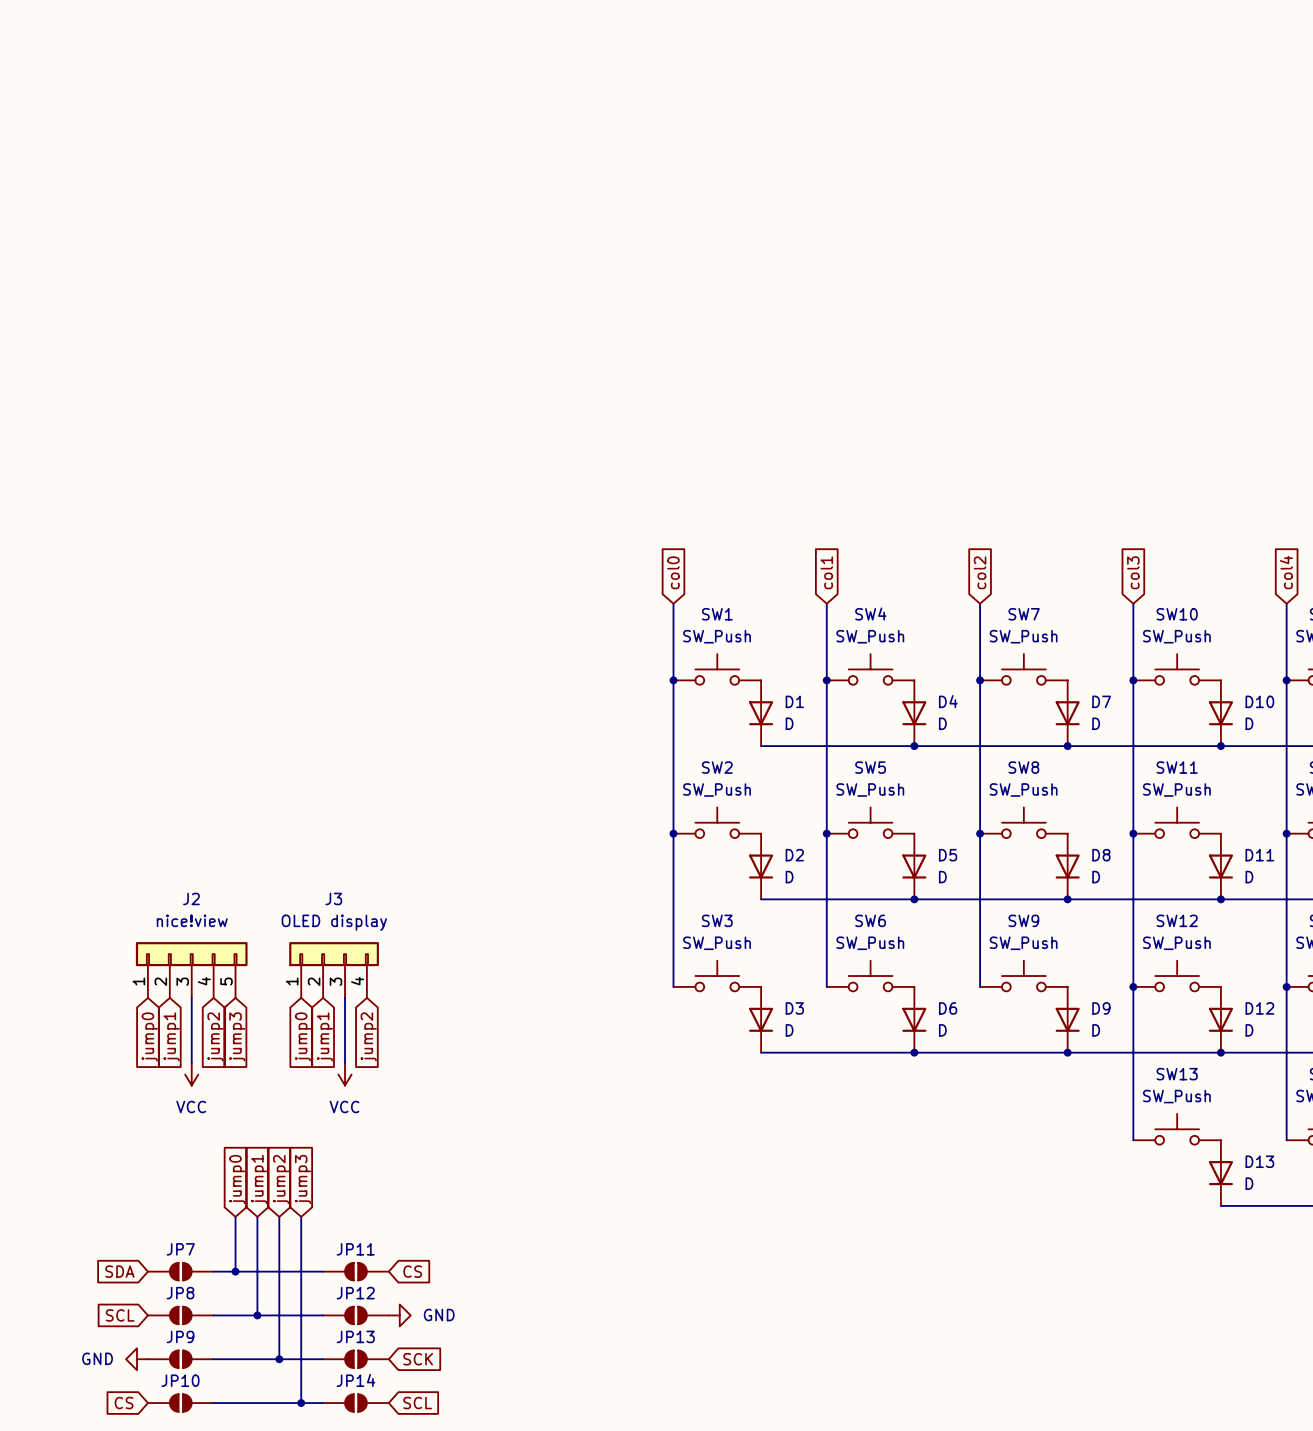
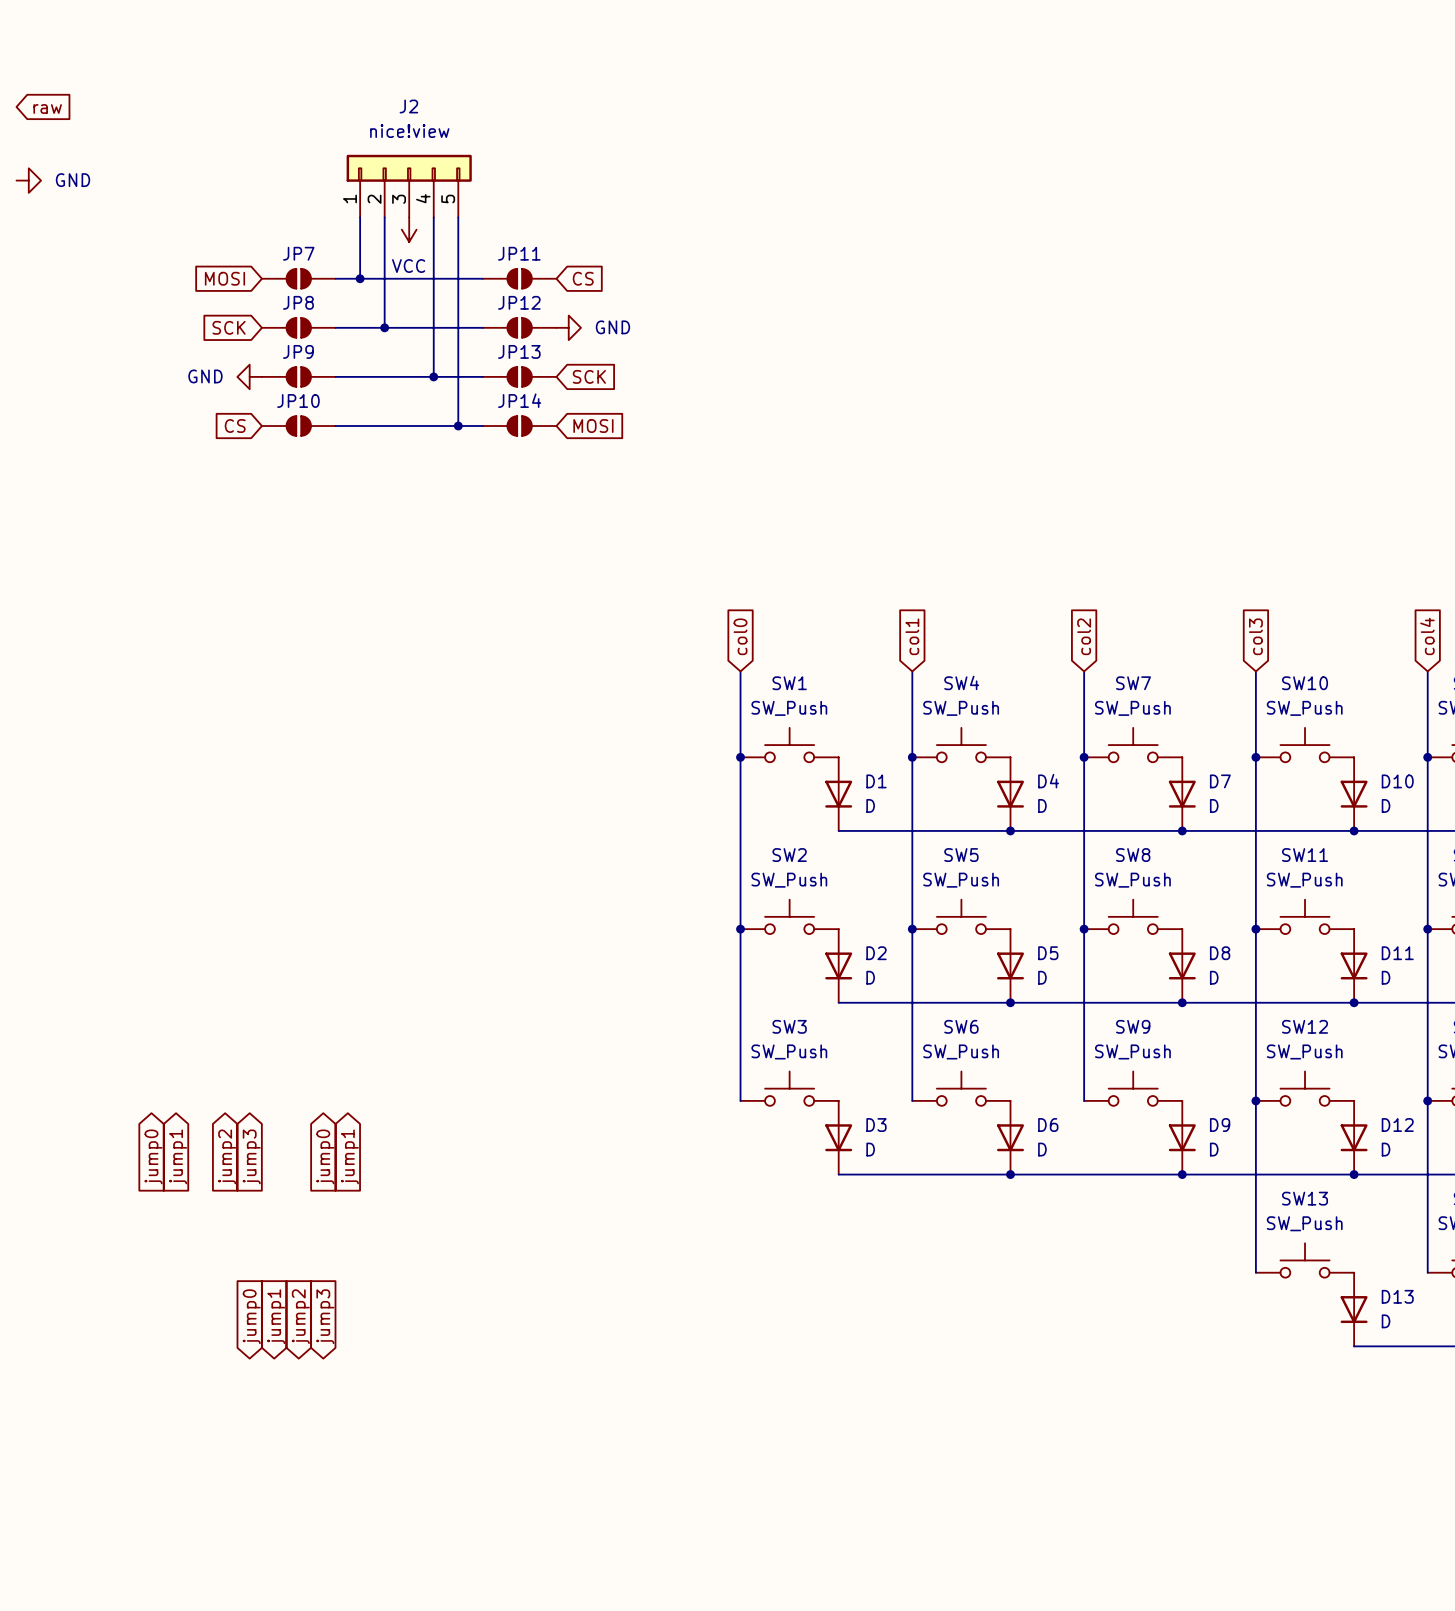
global label: none -> raw (47, 108)
power symbol: none -> GND (28, 180)
wire: none -> (360, 217) (360, 278)
wire: none -> (384, 217) (384, 327)
wire: none -> (433, 217) (433, 376)
wire: none -> (458, 217) (458, 426)
power symbol: none -> VCC (409, 229)
global label: none -> MOSI (224, 278)
wire: none -> (335, 278) (482, 278)
junction: none -> (360, 278)
global label: none -> CS (583, 278)
global label: none -> SCK (229, 327)
wire: none -> (335, 327) (482, 327)
junction: none -> (384, 327)
power symbol: none -> GND (568, 327)
power symbol: none -> GND (249, 376)
wire: none -> (335, 376) (482, 376)
junction: none -> (433, 376)
global label: none -> SCK (589, 376)
global label: none -> CS (235, 426)
wire: none -> (335, 426) (482, 426)
junction: none -> (458, 426)
global label: none -> MOSI (593, 426)
J2 position: (191, 969) -> (409, 186)
J3: OLED display (334, 969) -> none
wire: (191, 997) (191, 1063) -> none
wire: (345, 997) (345, 1063) -> none
global label: jump2 (368, 1036) -> none
power symbol: VCC (191, 1074) -> none
power symbol: VCC (345, 1074) -> none
wire: (235, 1216) (235, 1271) -> none
wire: (257, 1216) (257, 1315) -> none
wire: (279, 1216) (279, 1359) -> none
wire: (301, 1216) (301, 1403) -> none
global label: SDA (119, 1271) -> none
JP7 position: (180, 1271) -> (298, 278)
wire: (213, 1271) (323, 1271) -> none
junction: (235, 1271) -> none
JP11 position: (355, 1271) -> (519, 278)
global label: CS (412, 1271) -> none
global label: SCL (120, 1315) -> none
JP8 position: (180, 1315) -> (298, 327)
wire: (213, 1315) (323, 1315) -> none
junction: (257, 1315) -> none
JP12 position: (355, 1315) -> (519, 327)
power symbol: GND (399, 1315) -> none
power symbol: GND (136, 1359) -> none
JP9 position: (180, 1359) -> (298, 376)
wire: (213, 1359) (323, 1359) -> none
junction: (279, 1359) -> none
JP13 position: (355, 1359) -> (519, 376)
global label: SCK (418, 1359) -> none
global label: CS (124, 1403) -> none
JP10 position: (180, 1403) -> (298, 426)
wire: (213, 1403) (323, 1403) -> none
junction: (301, 1403) -> none
JP14 position: (355, 1403) -> (519, 426)
global label: SCL (417, 1403) -> none

